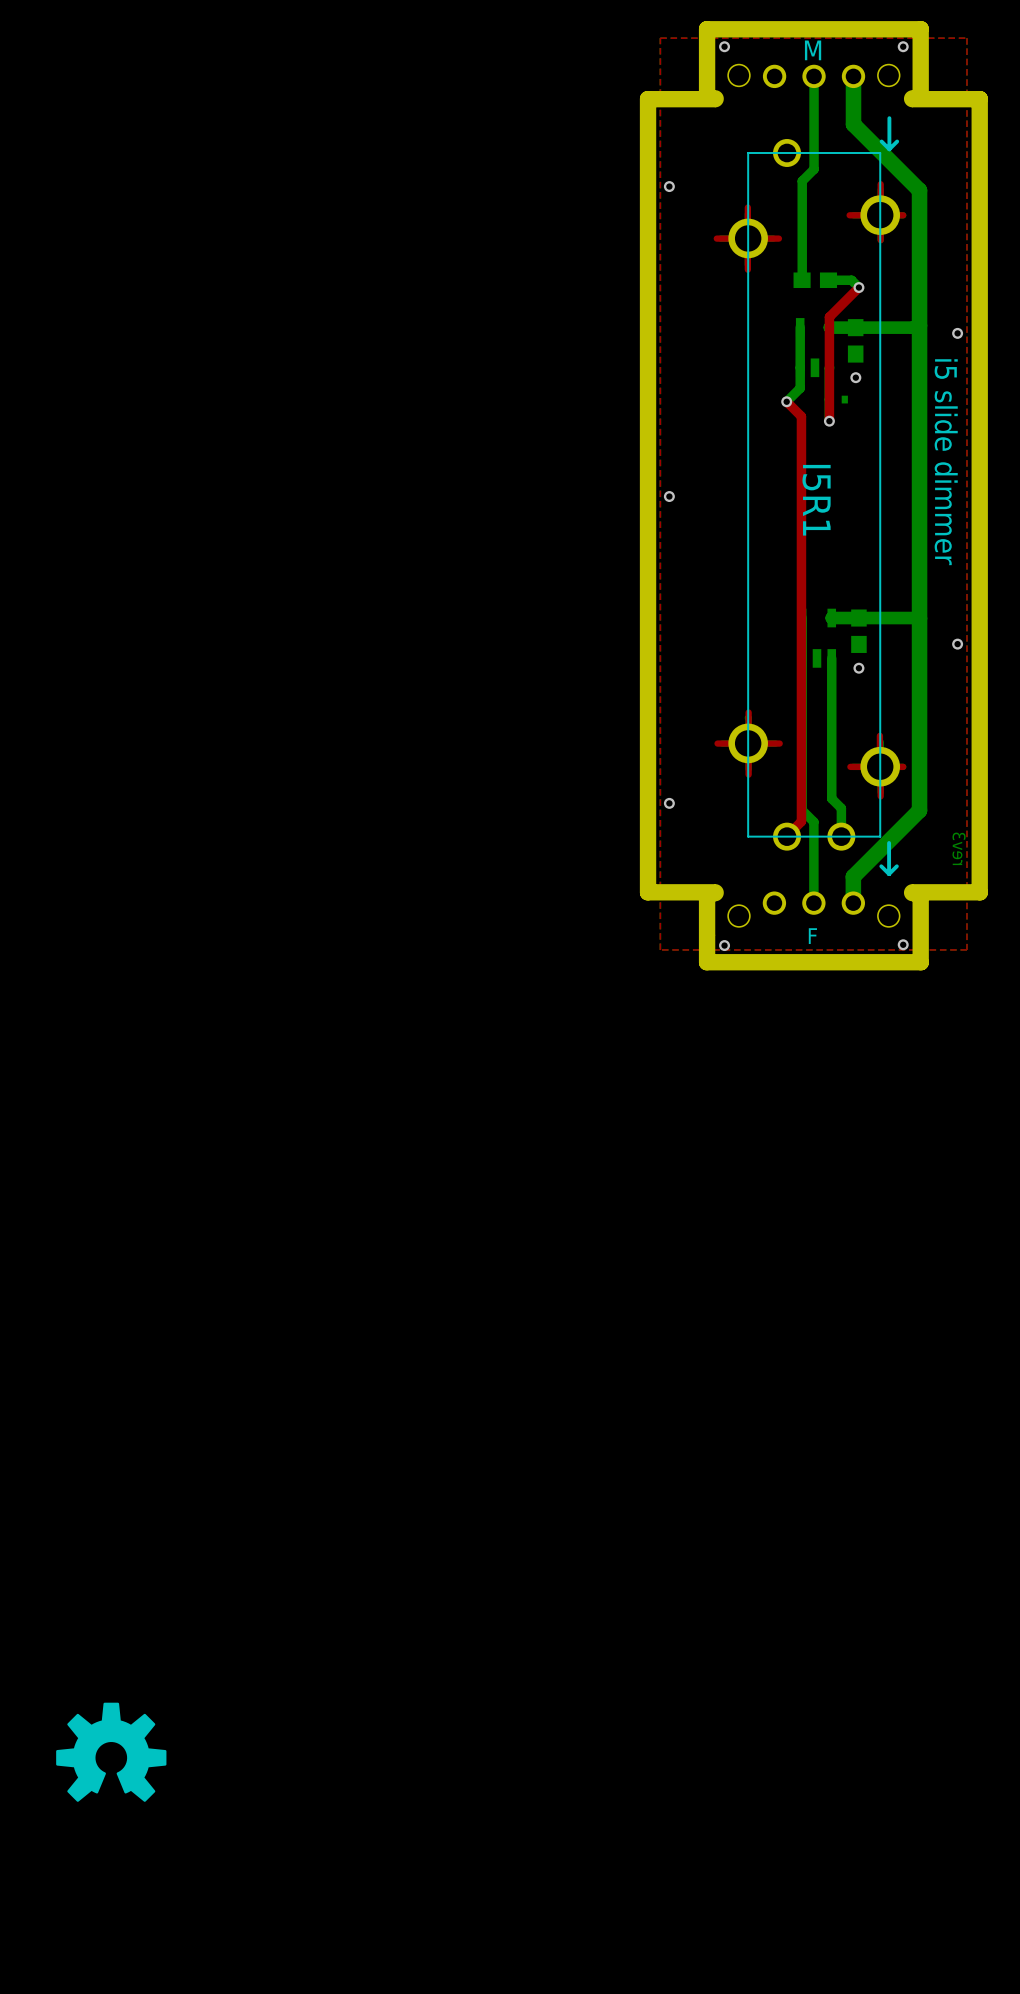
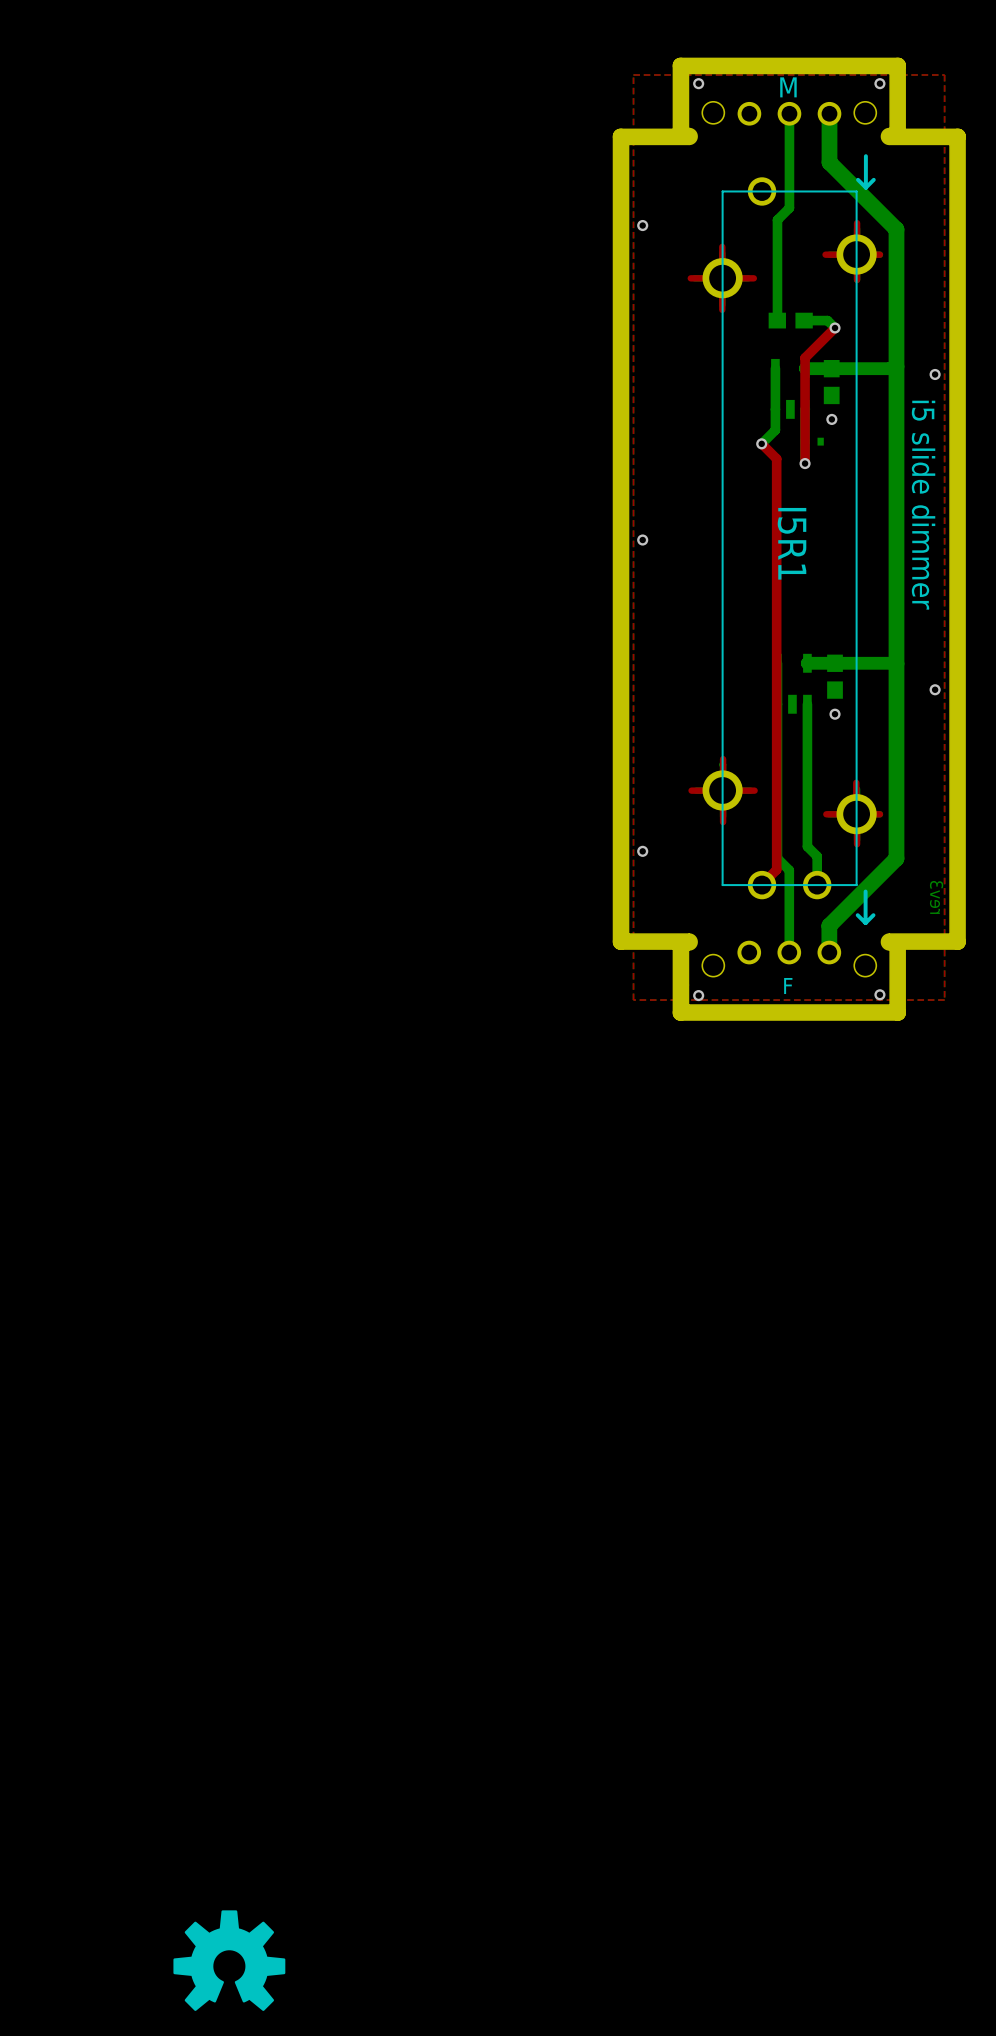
drawing position: (111, 1752) -> (229, 1960)

